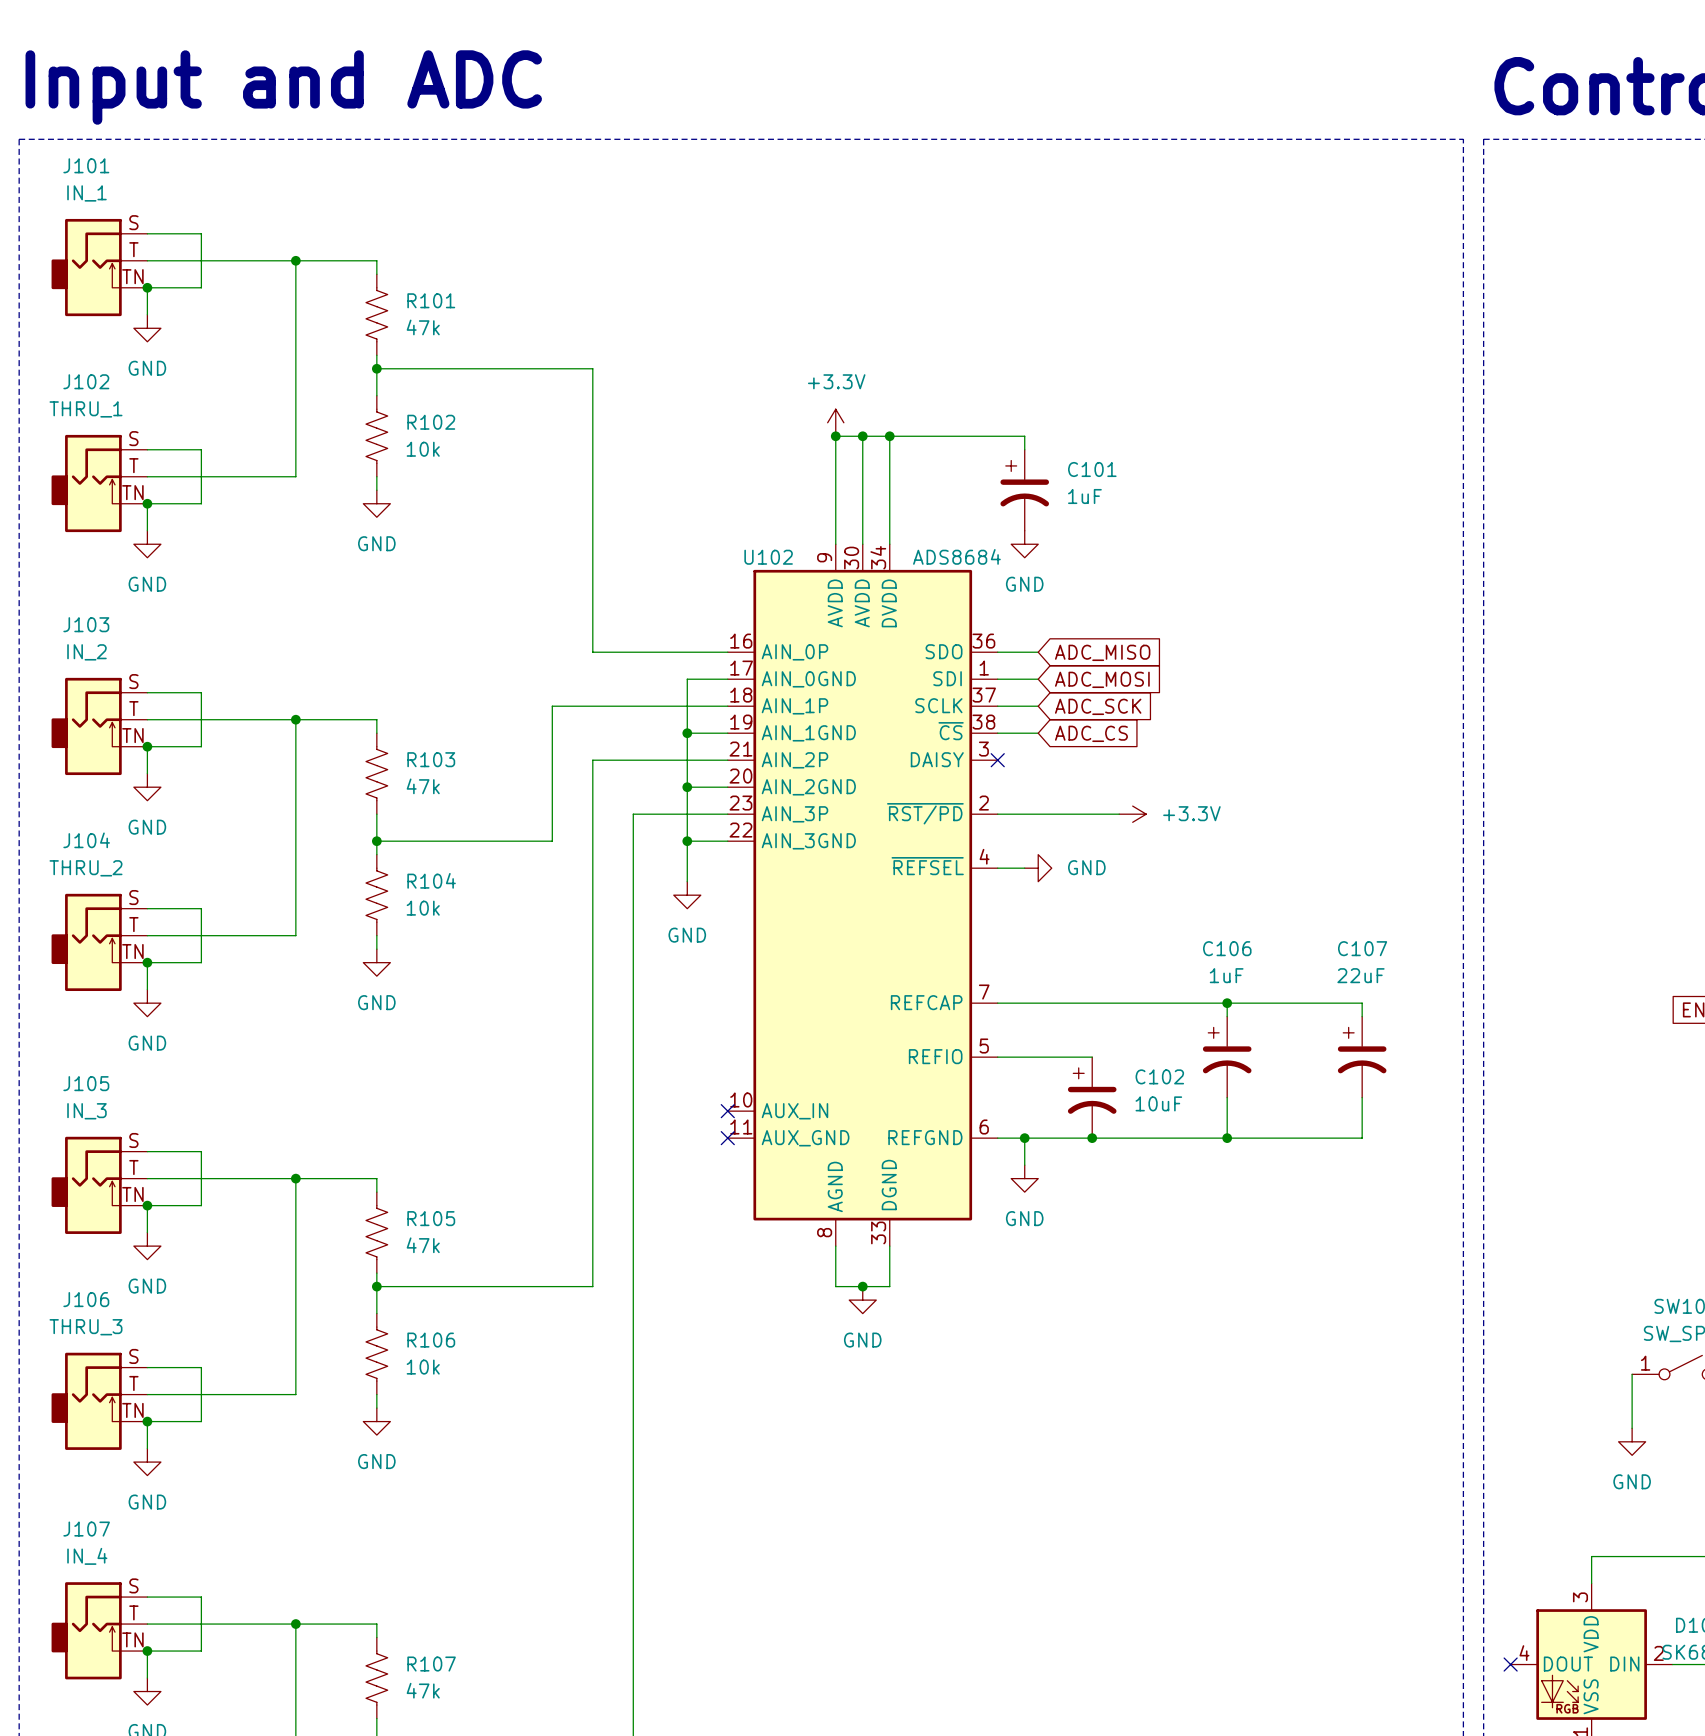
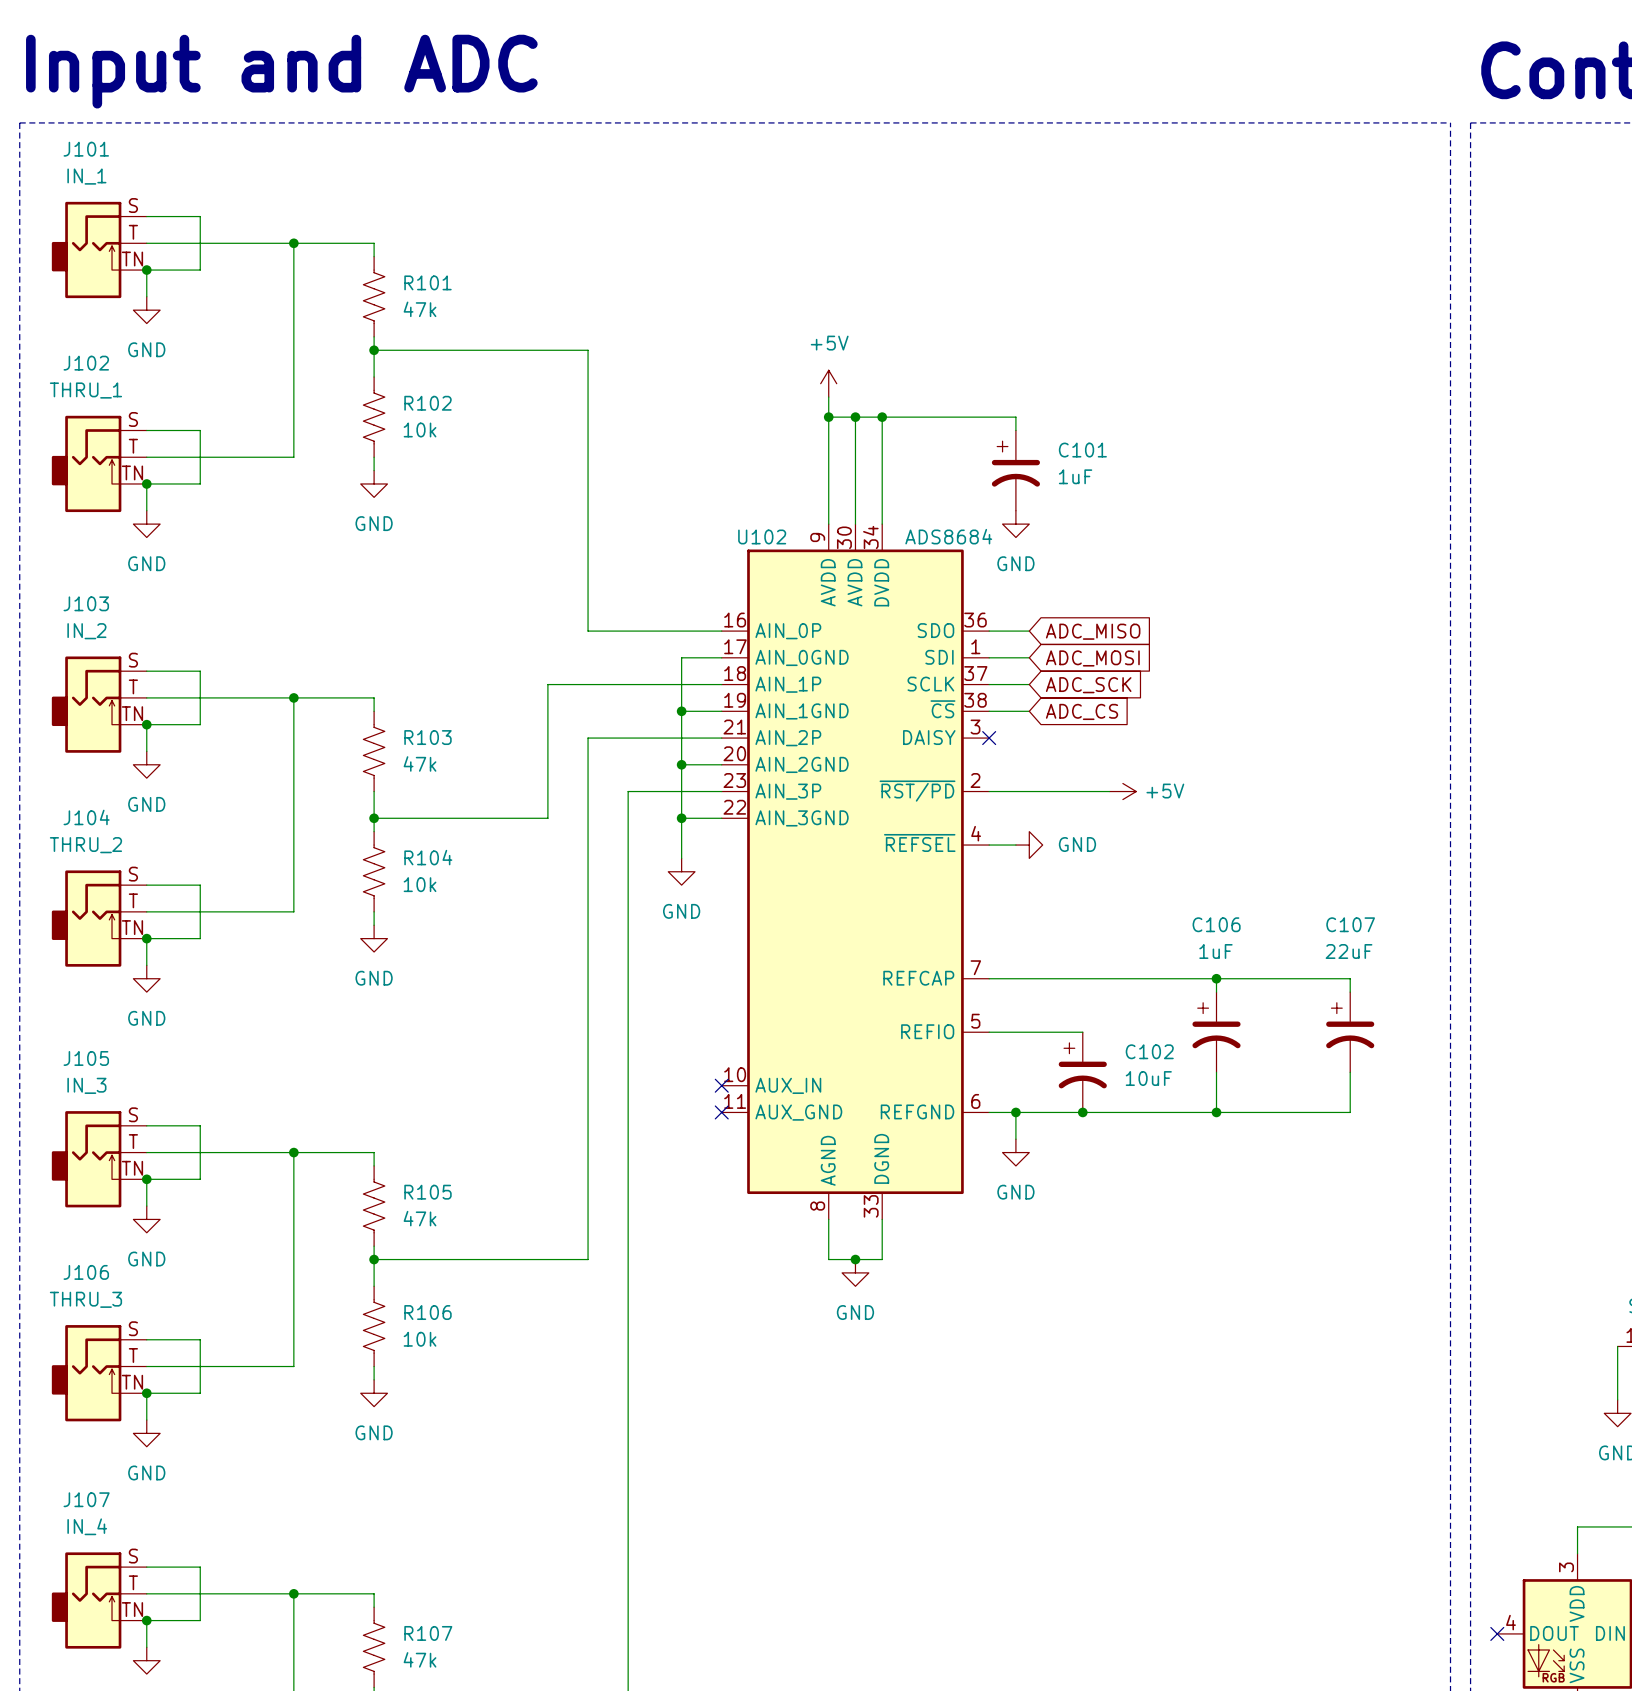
power symbol: none -> +5V (828, 383)
power symbol: +3.3V (835, 422) -> none
power symbol: +3.3V (1132, 814) -> +5V (1122, 791)

